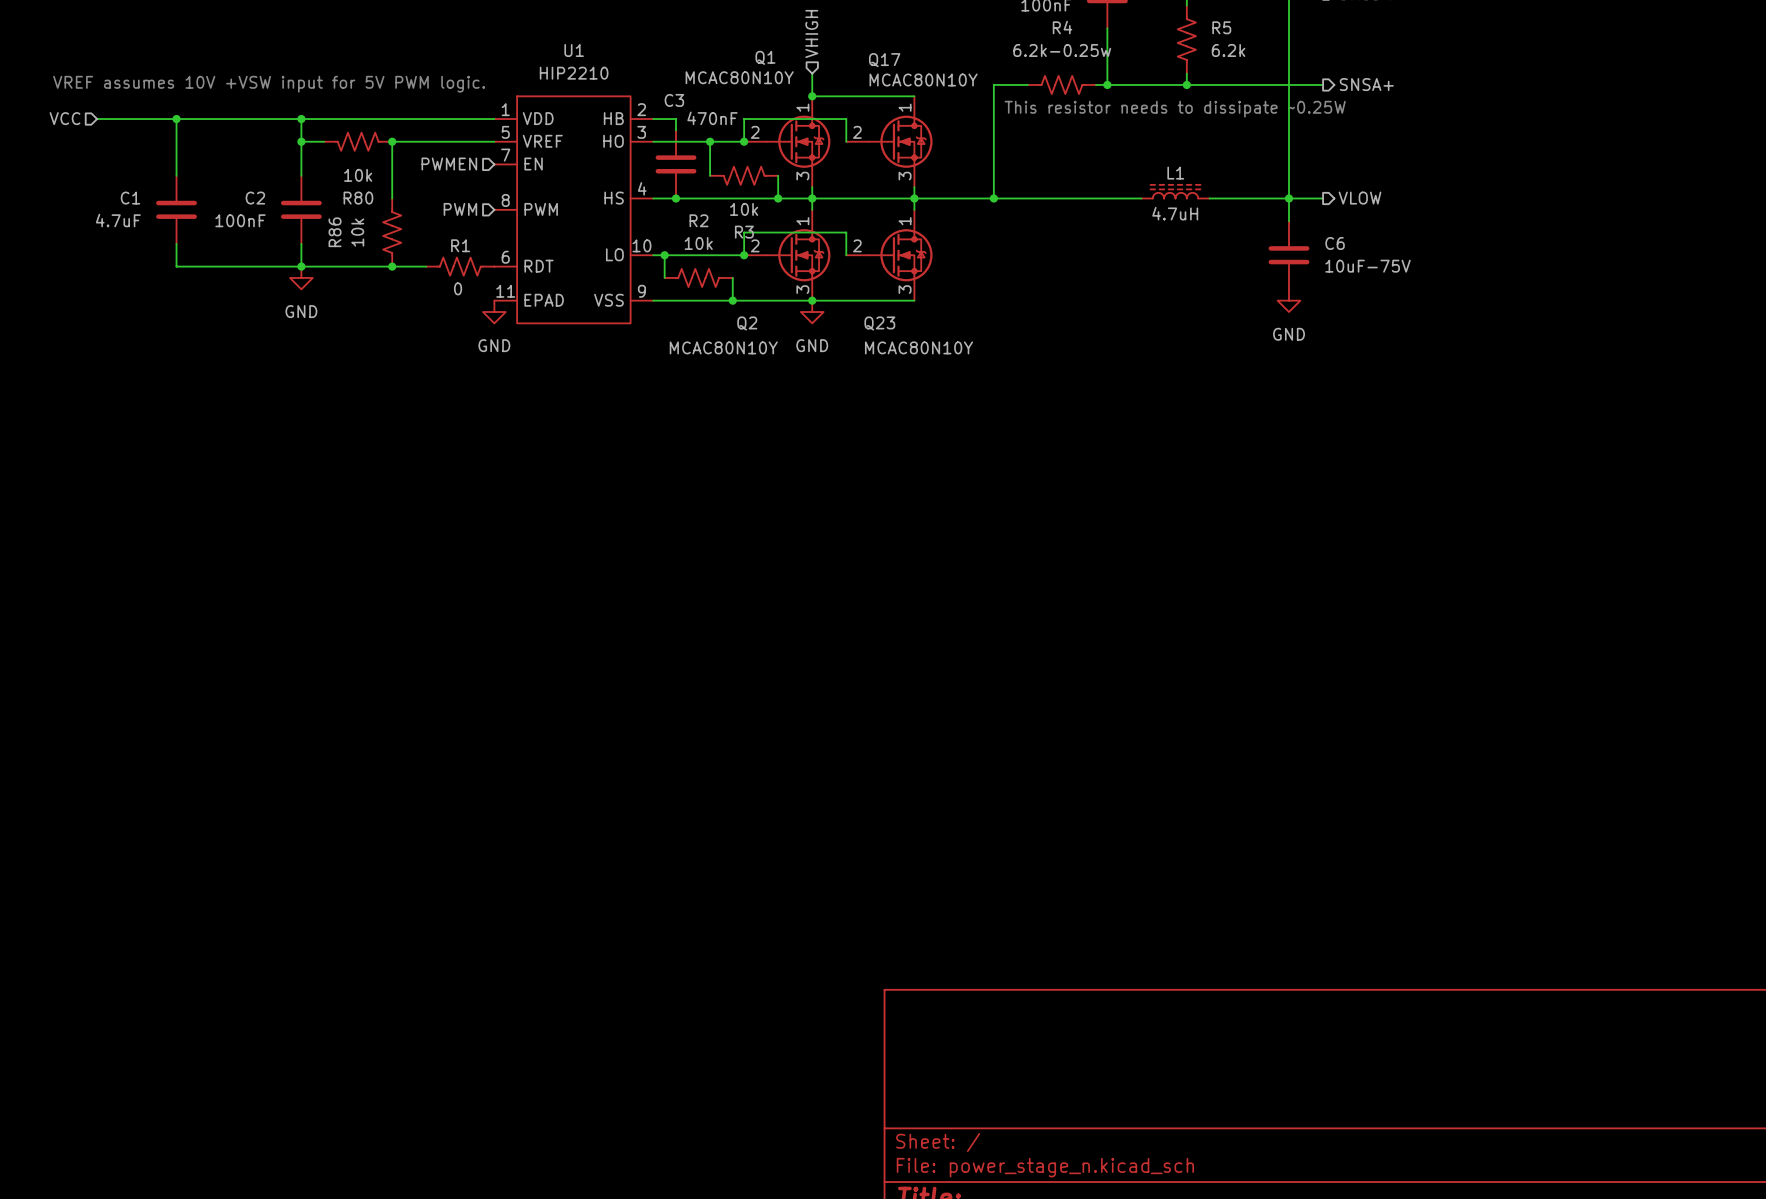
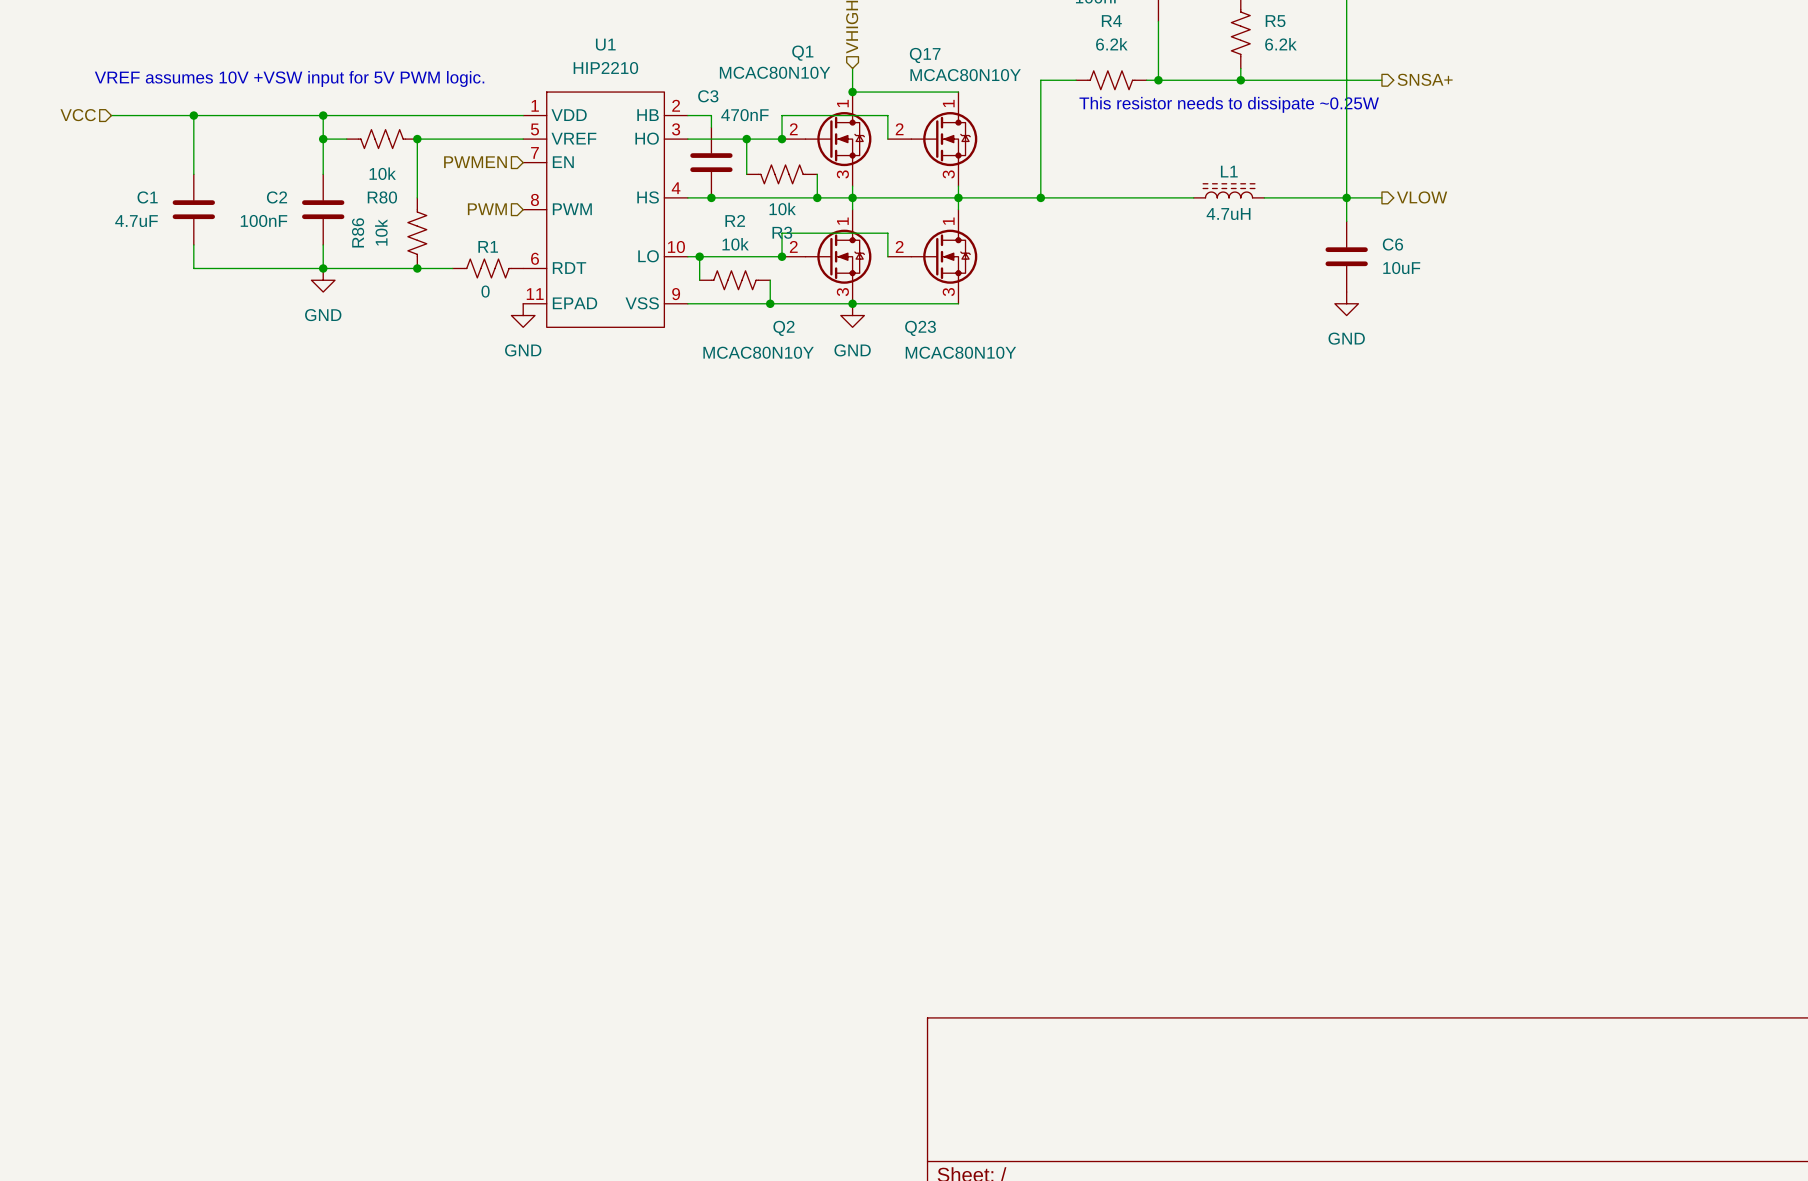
R4 value: 6.2k-0.25w (1062, 50) -> 6.2k (1111, 44)
C6 value: 10uF-75V (1368, 266) -> 10uF (1401, 268)

